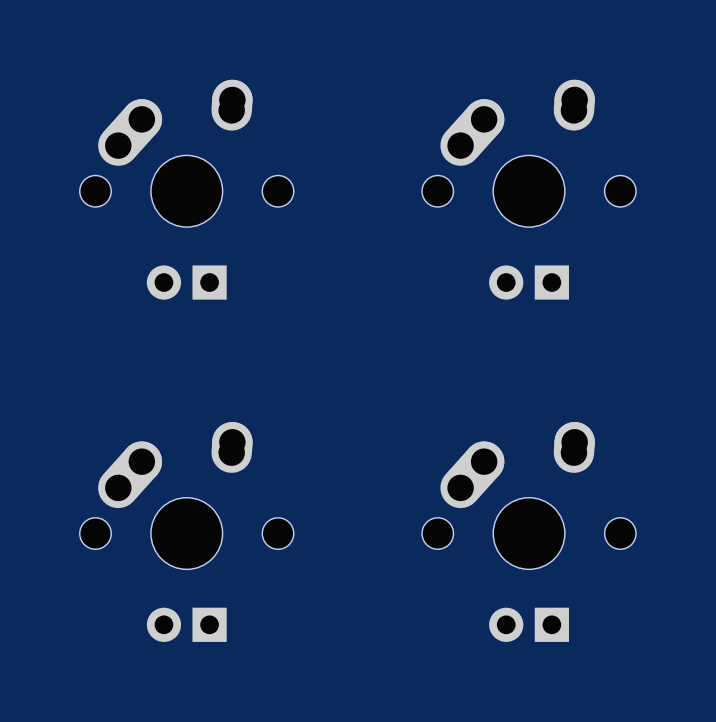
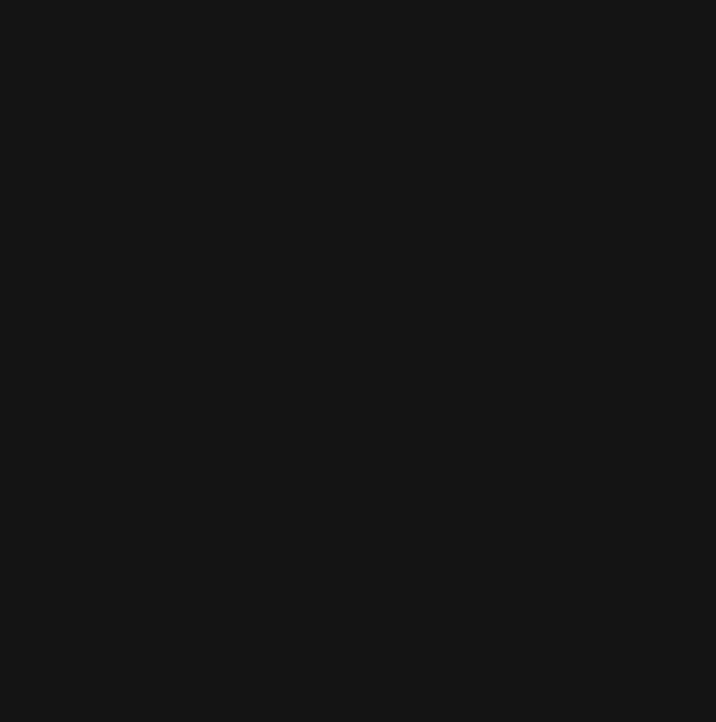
part: (186, 189) -> none
part: (529, 189) -> none
part: (186, 531) -> none
part: (529, 531) -> none

